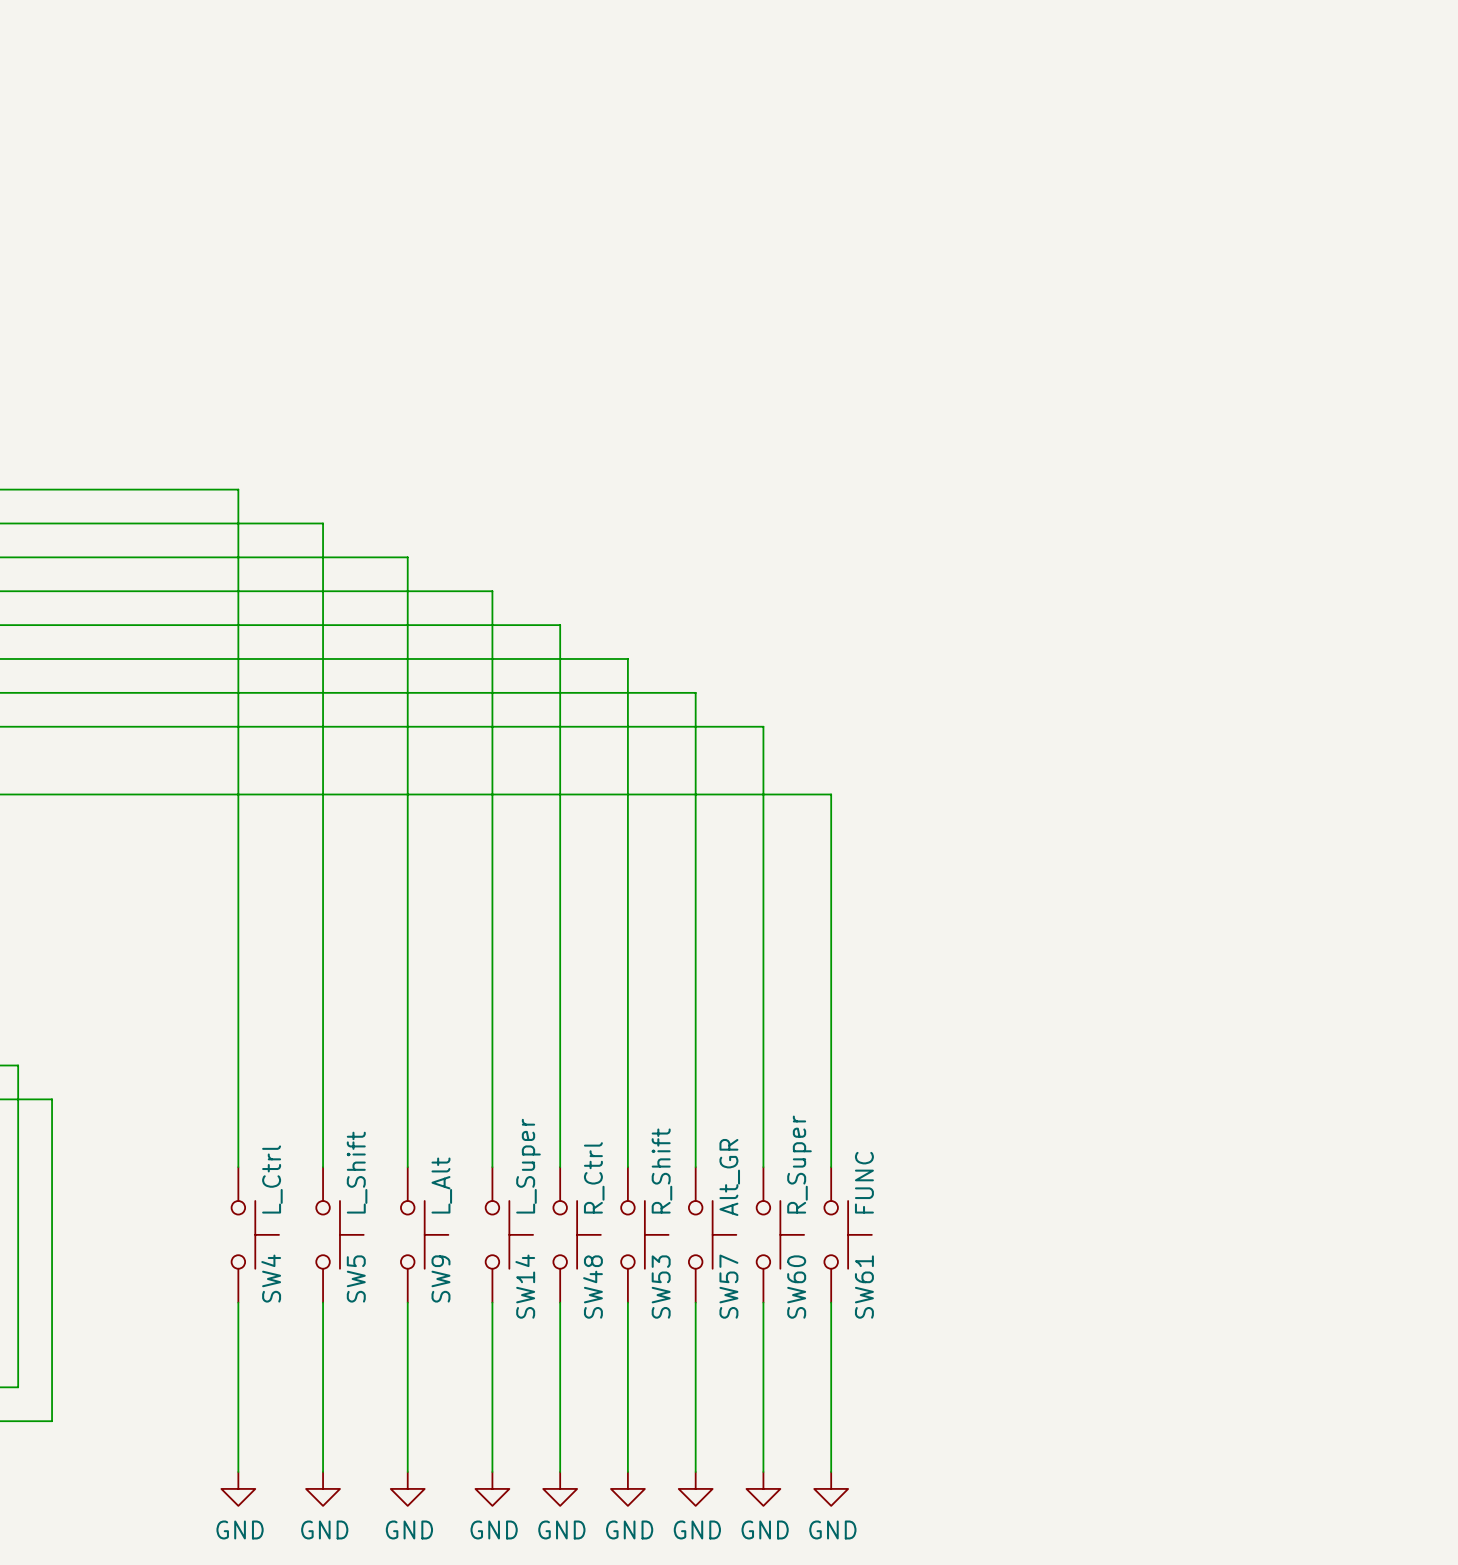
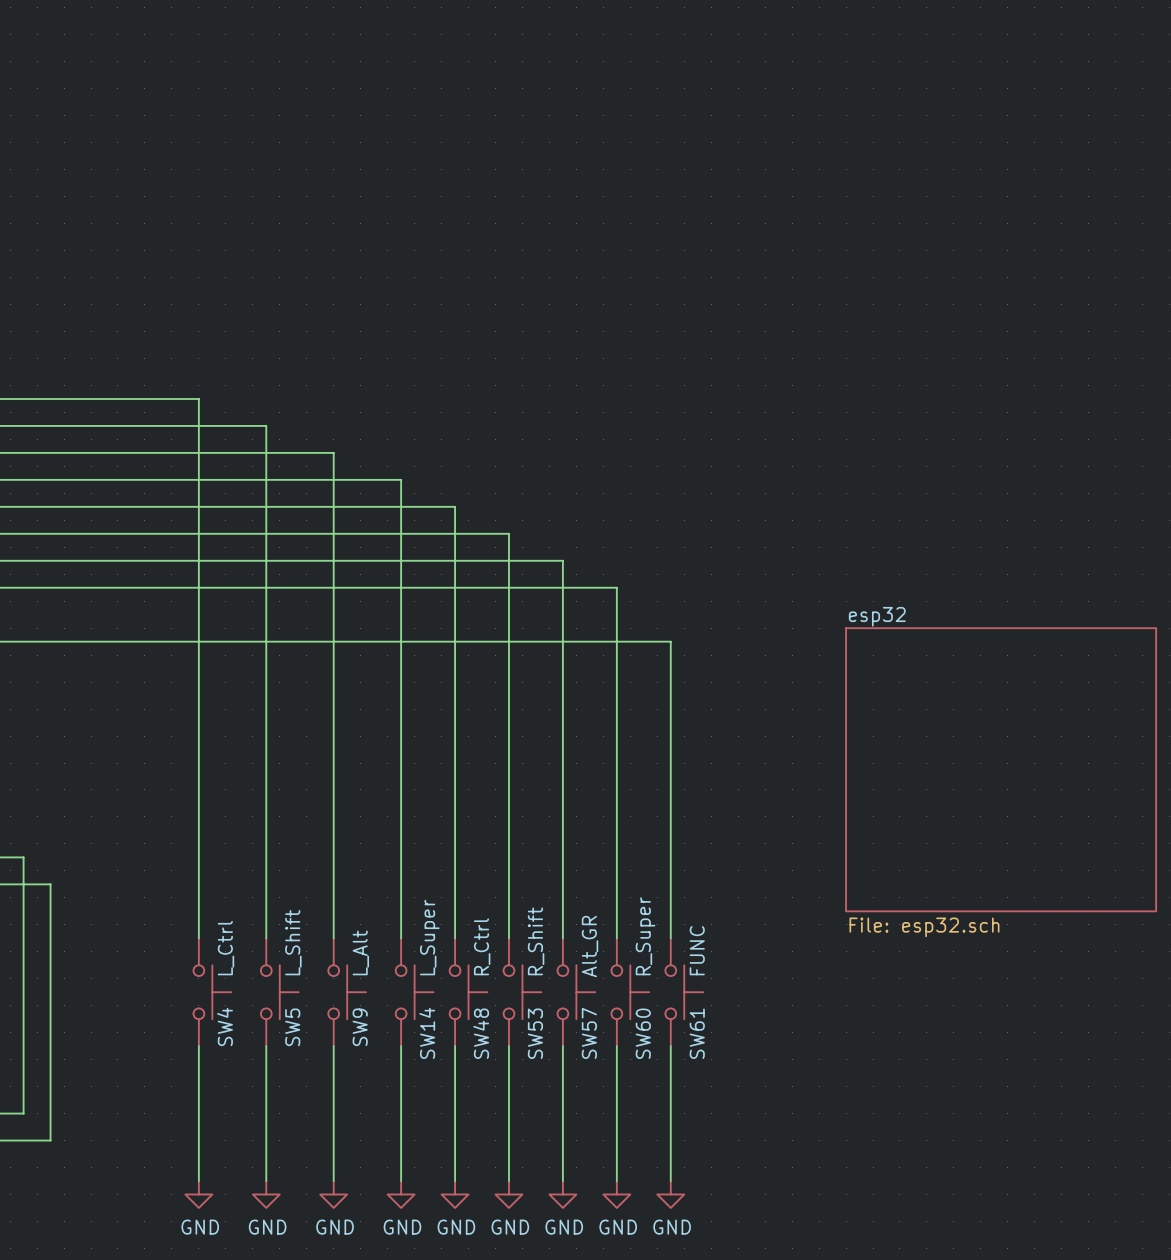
sheet esp32: none -> File: esp32.sch (1001, 769)

